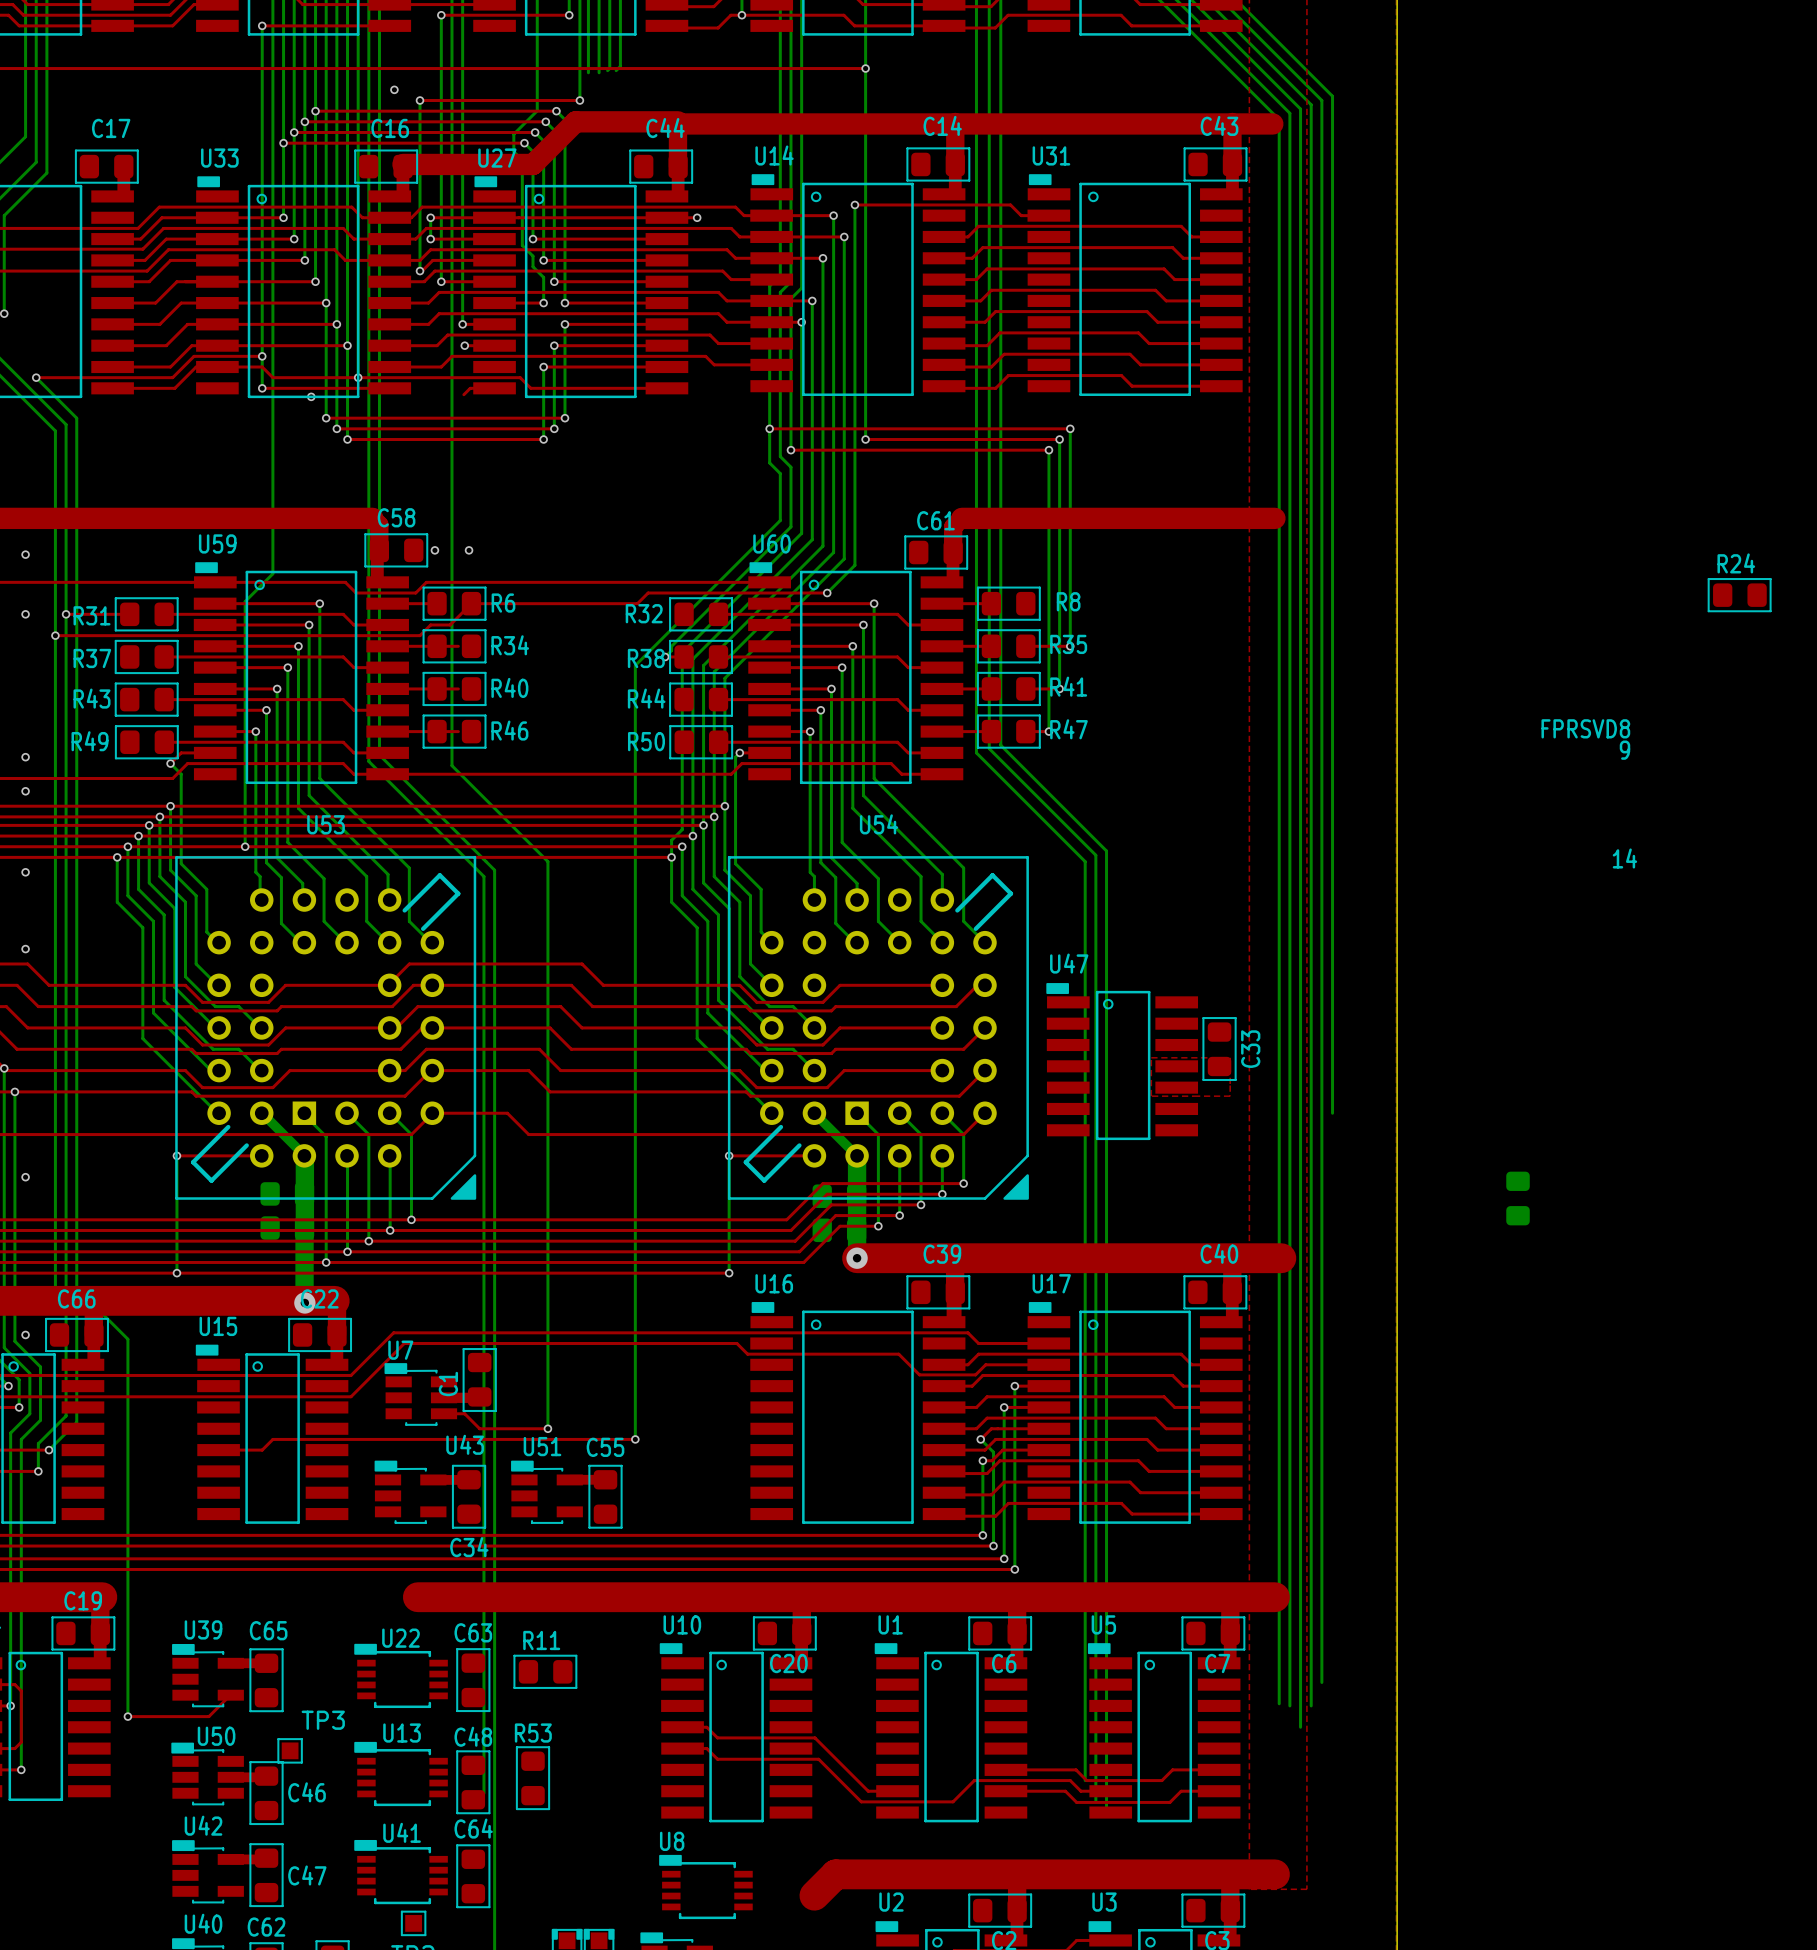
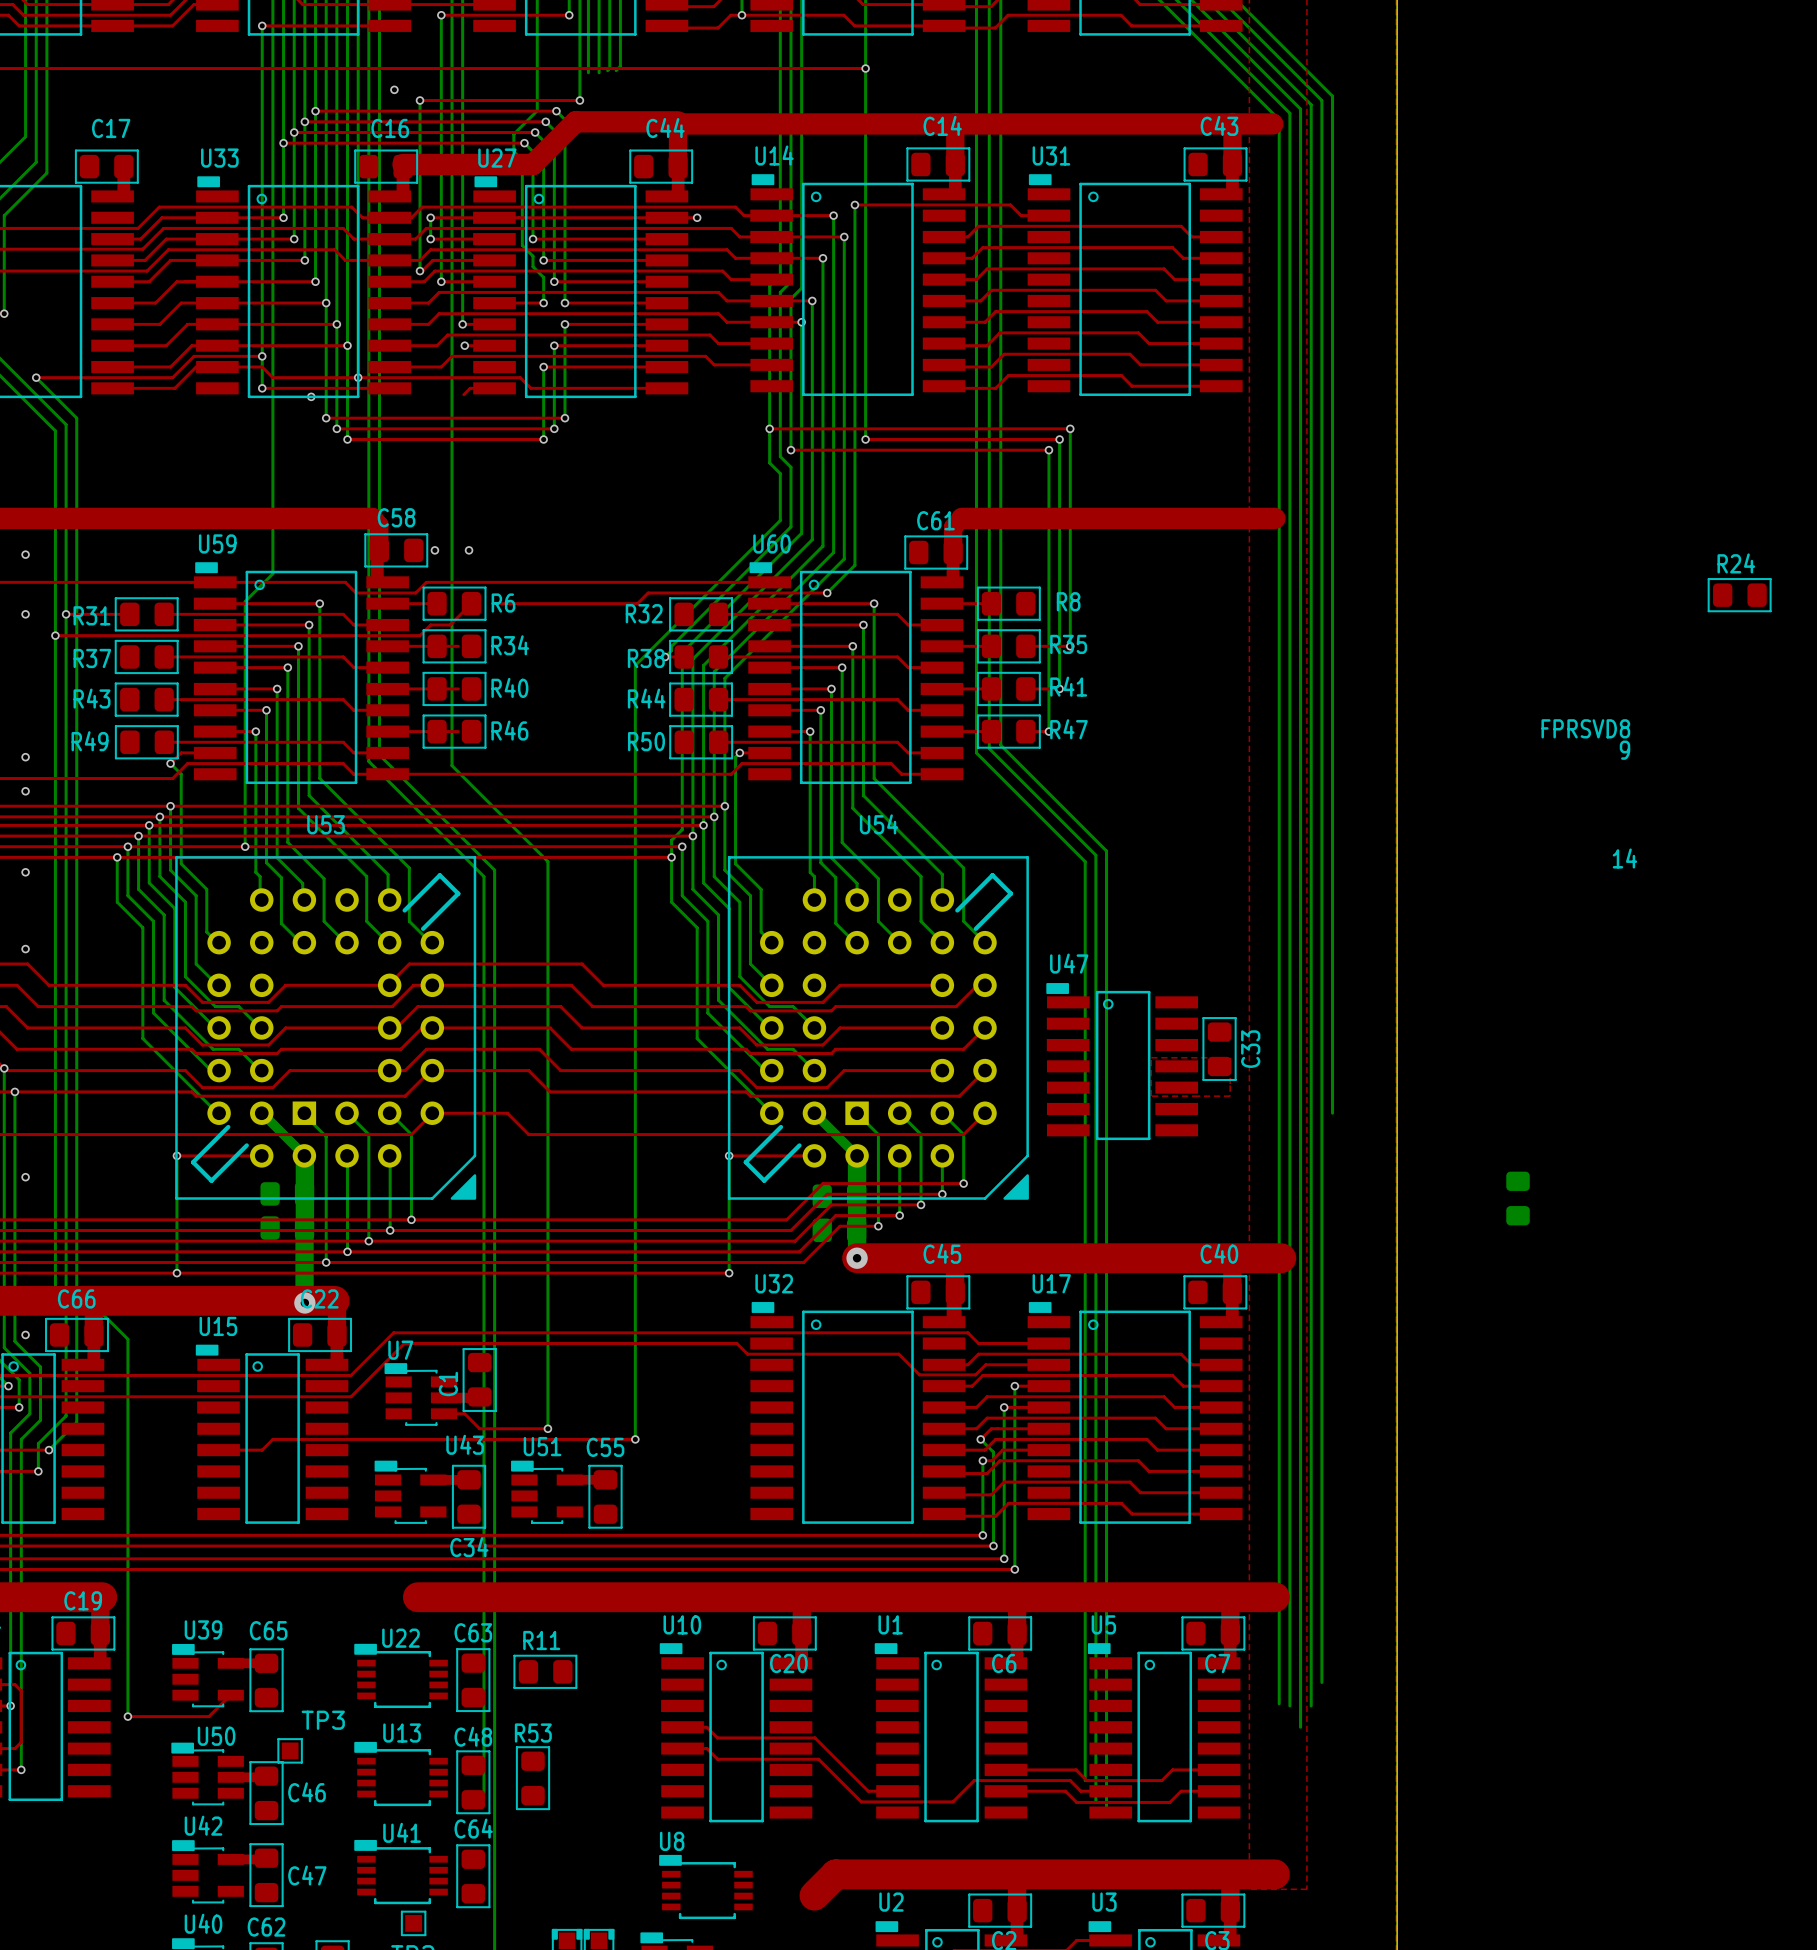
top track: (471, 603) (492, 603) -> none
C39 name: C39 (942, 1254) -> C45 (942, 1253)
U16 name: U16 (774, 1283) -> U32 (774, 1283)

